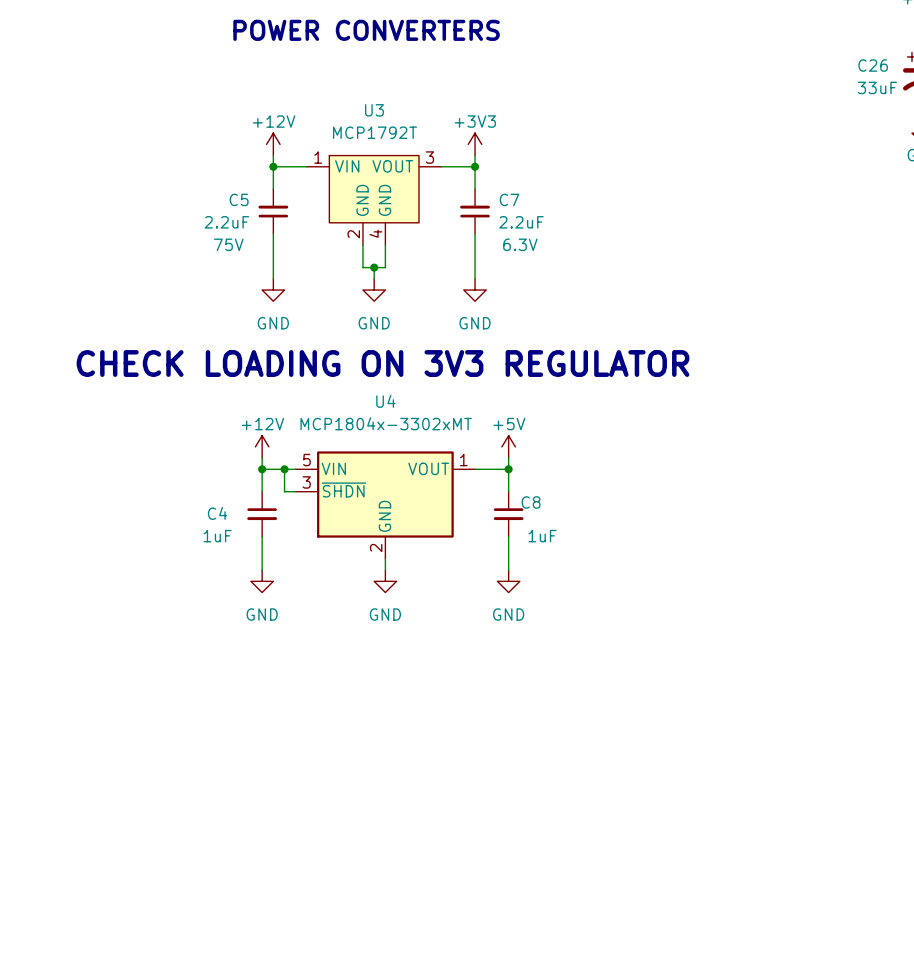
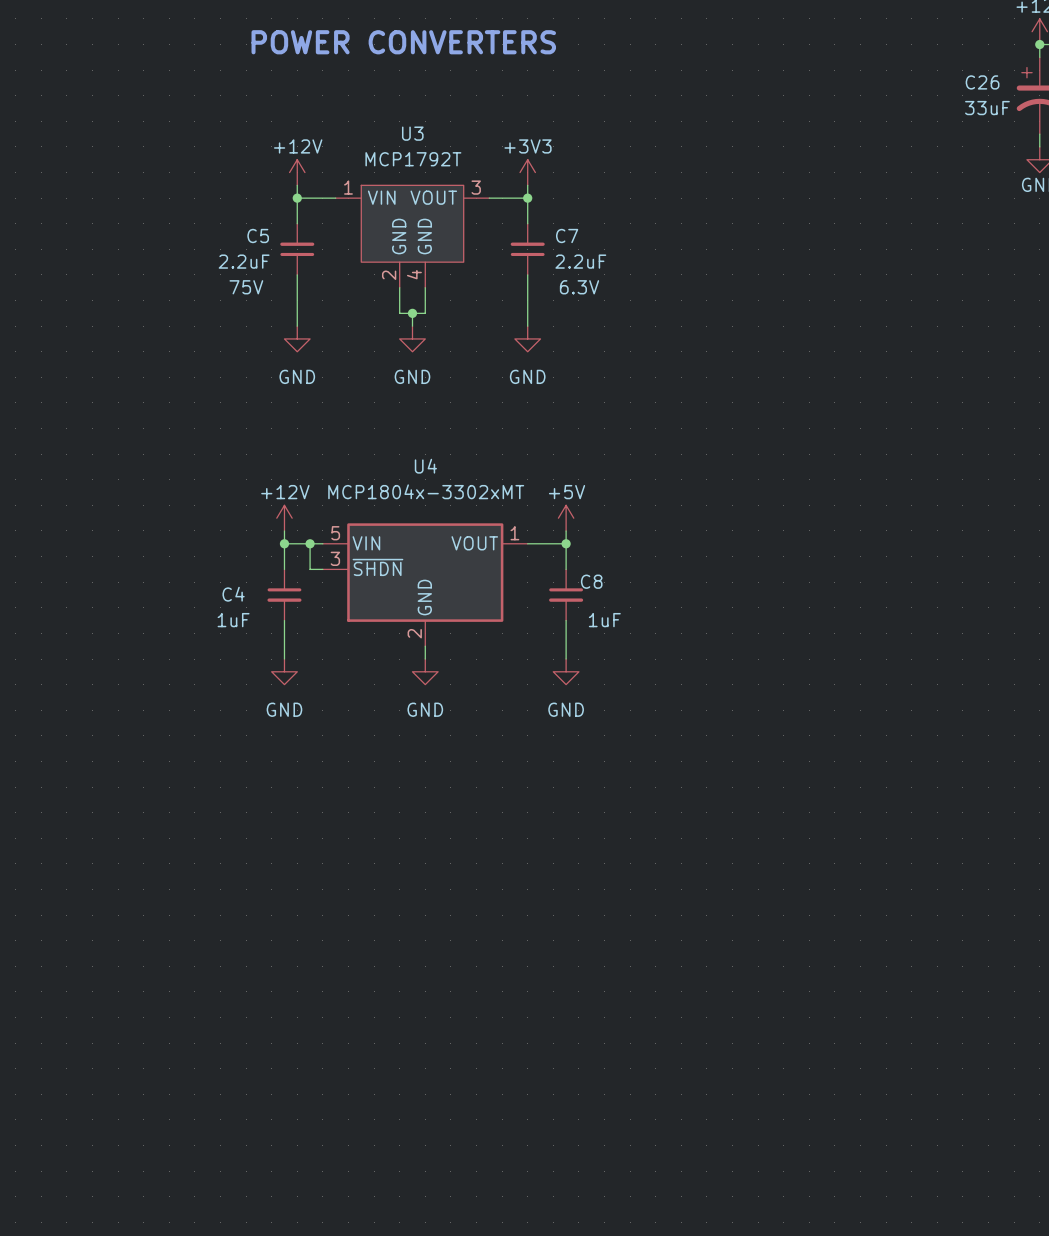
text: CHECK LOADING ON 3V3 REGULATOR (383, 363) -> none

